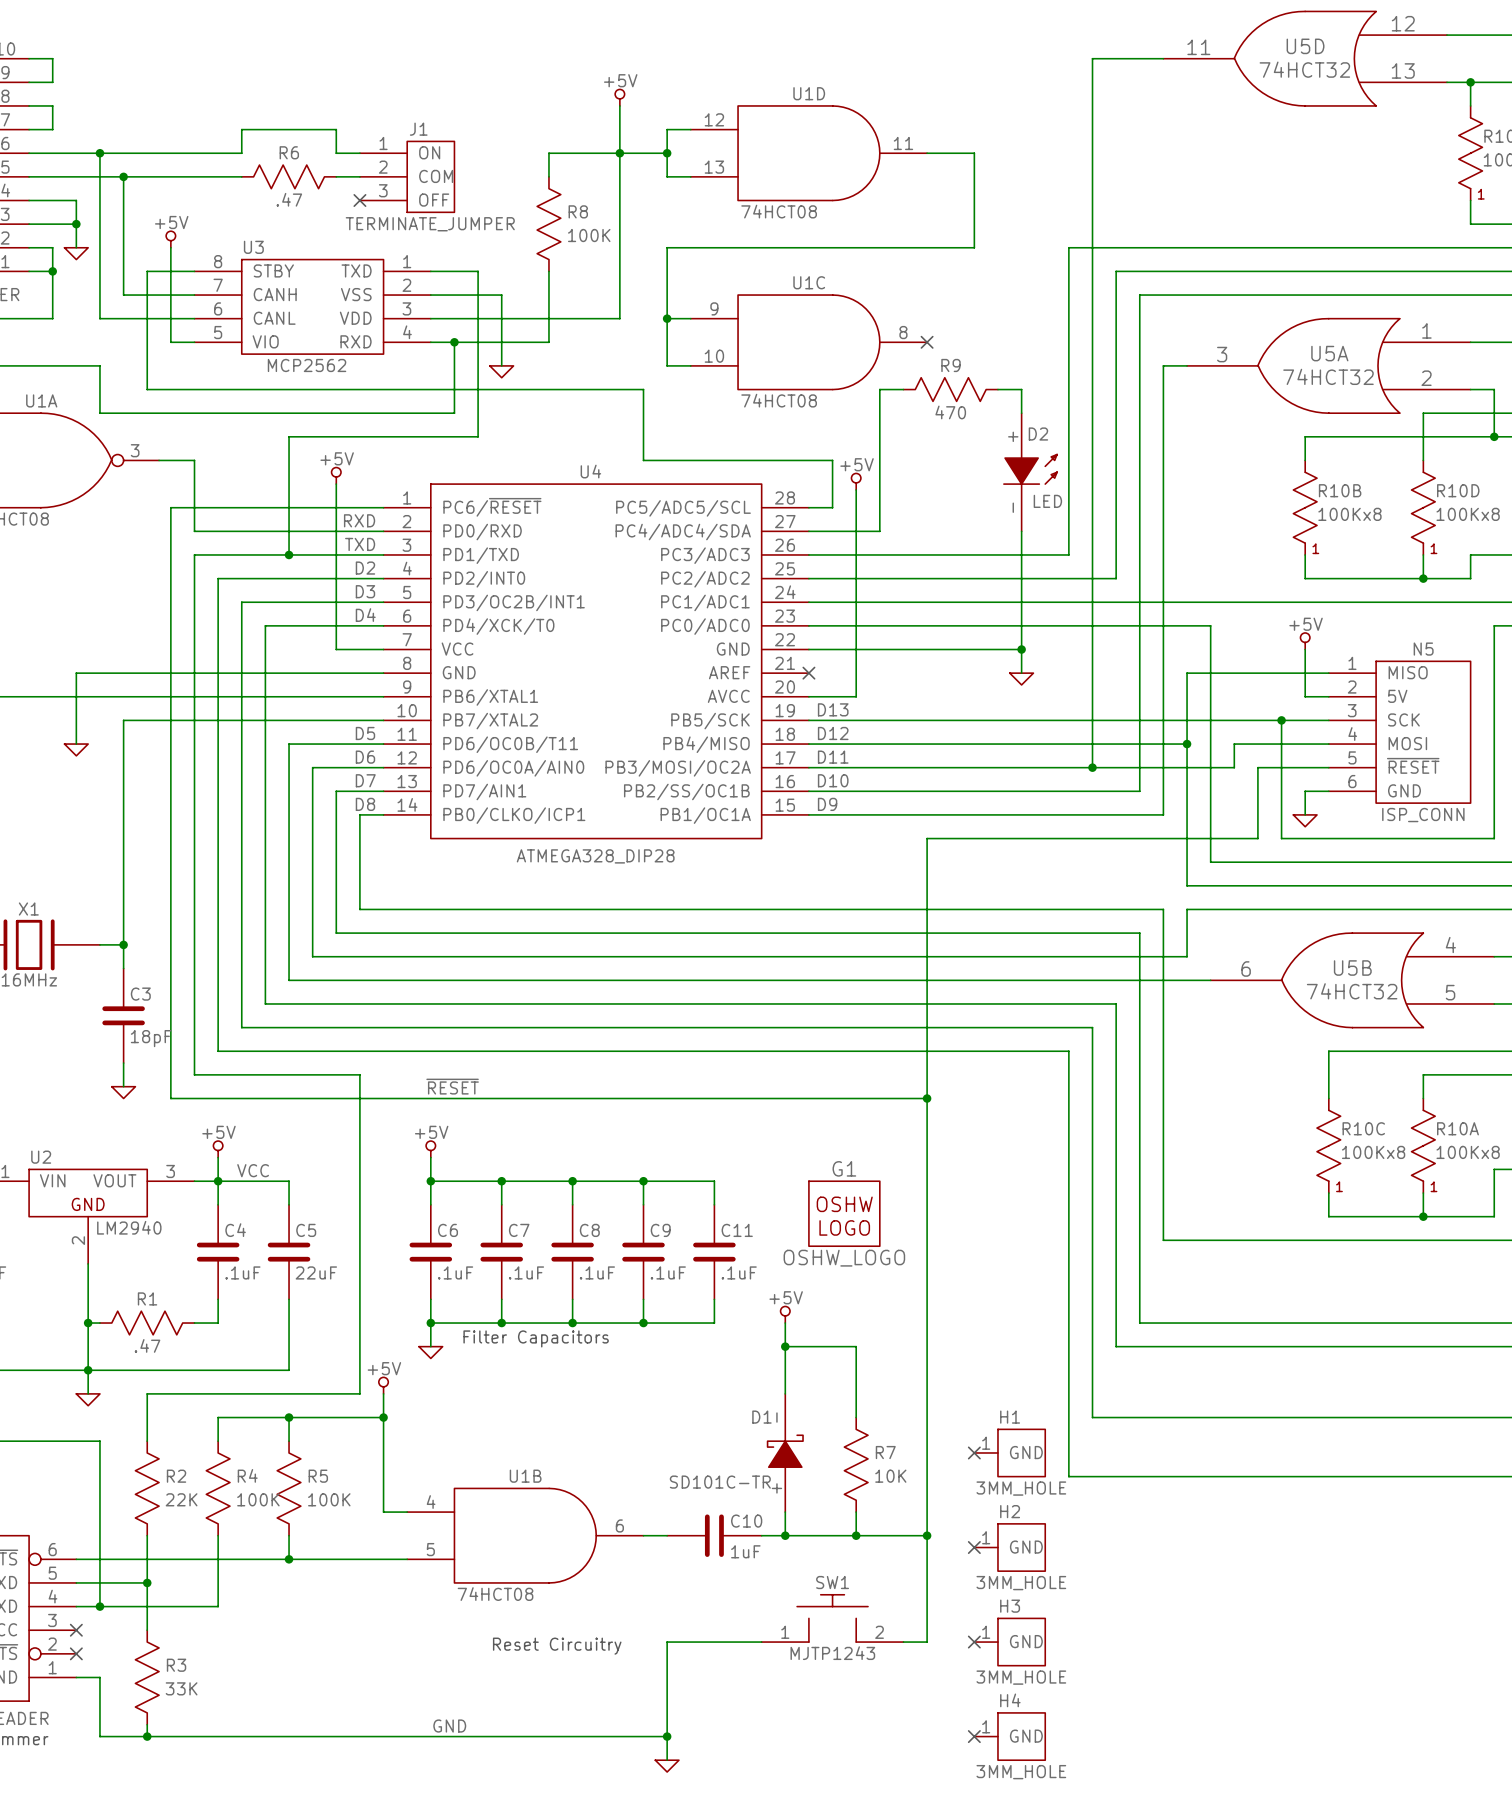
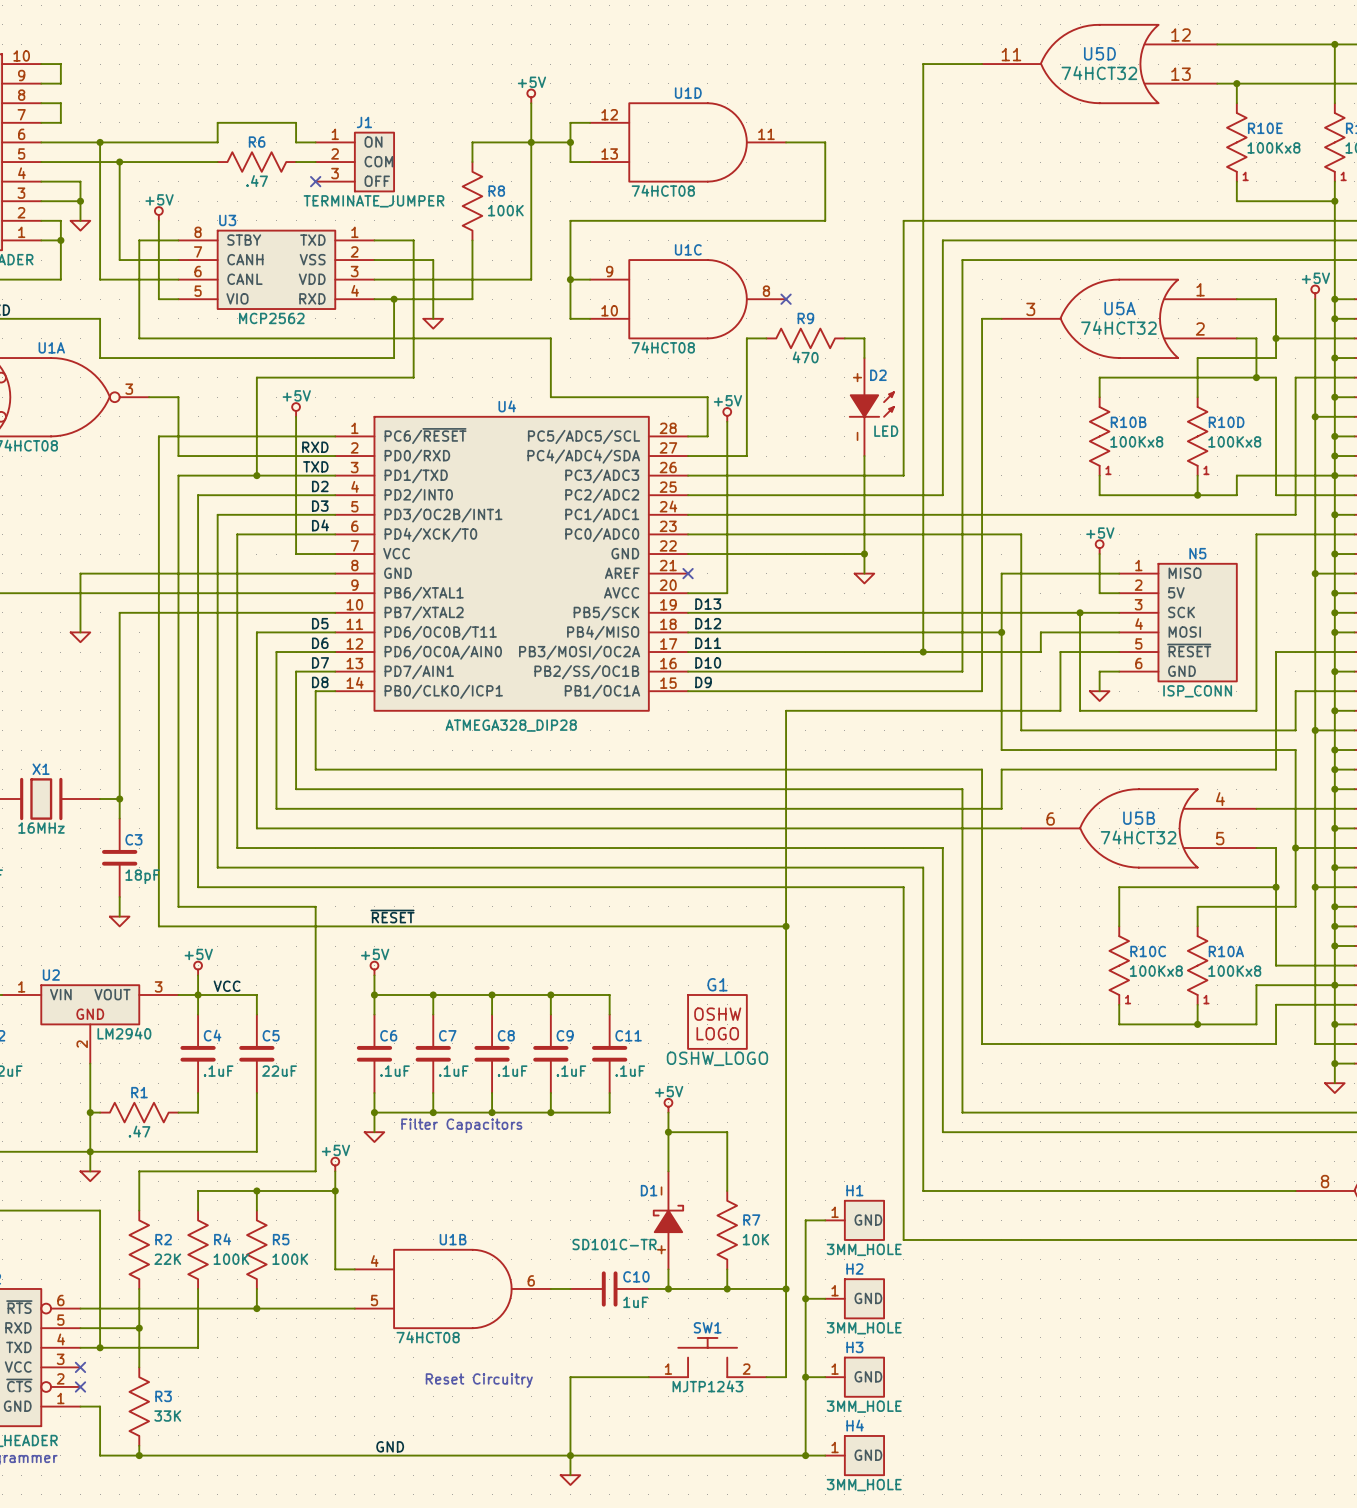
wire: none -> (825, 1220) (805, 1220) (805, 1455)
no-connect mark: (974, 1452) -> none
wire: none -> (805, 1298) (825, 1298)
junction: none -> (805, 1298)
no-connect mark: (974, 1547) -> none
wire: none -> (805, 1377) (825, 1377)
junction: none -> (805, 1377)
no-connect mark: (974, 1642) -> none
wire: none -> (570, 1455) (825, 1455)
junction: none -> (805, 1455)
no-connect mark: (974, 1736) -> none

